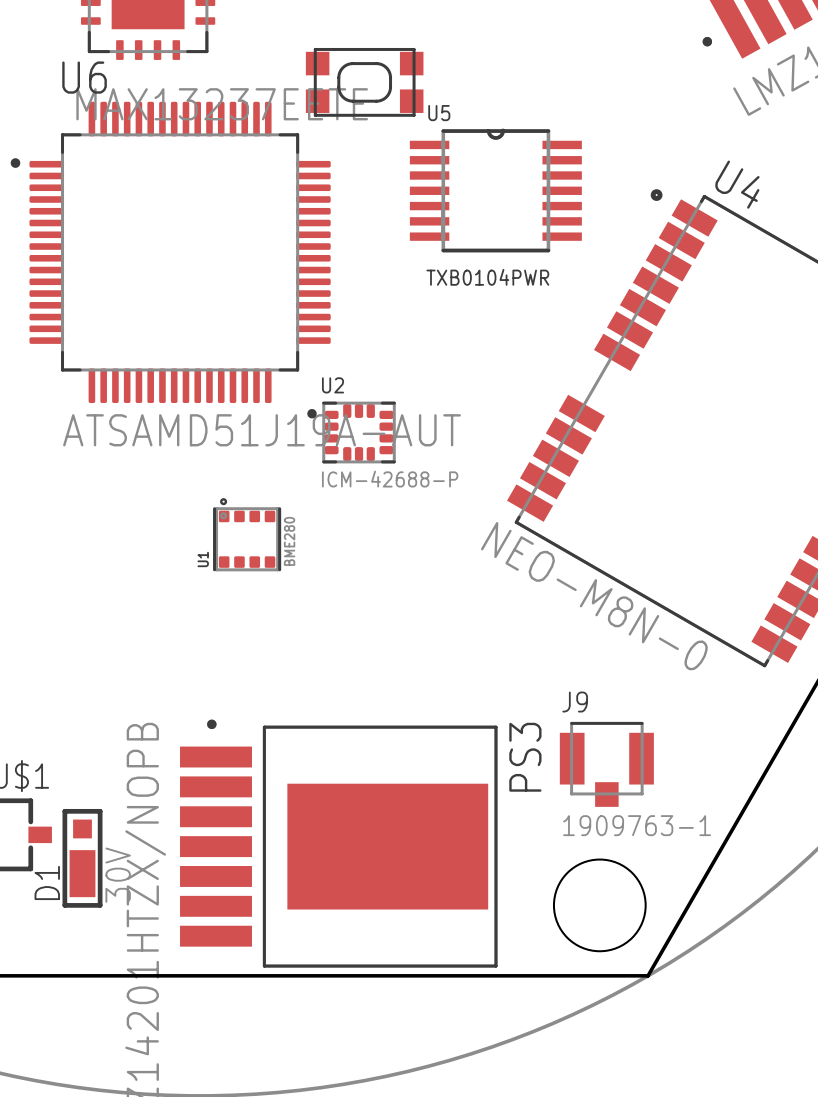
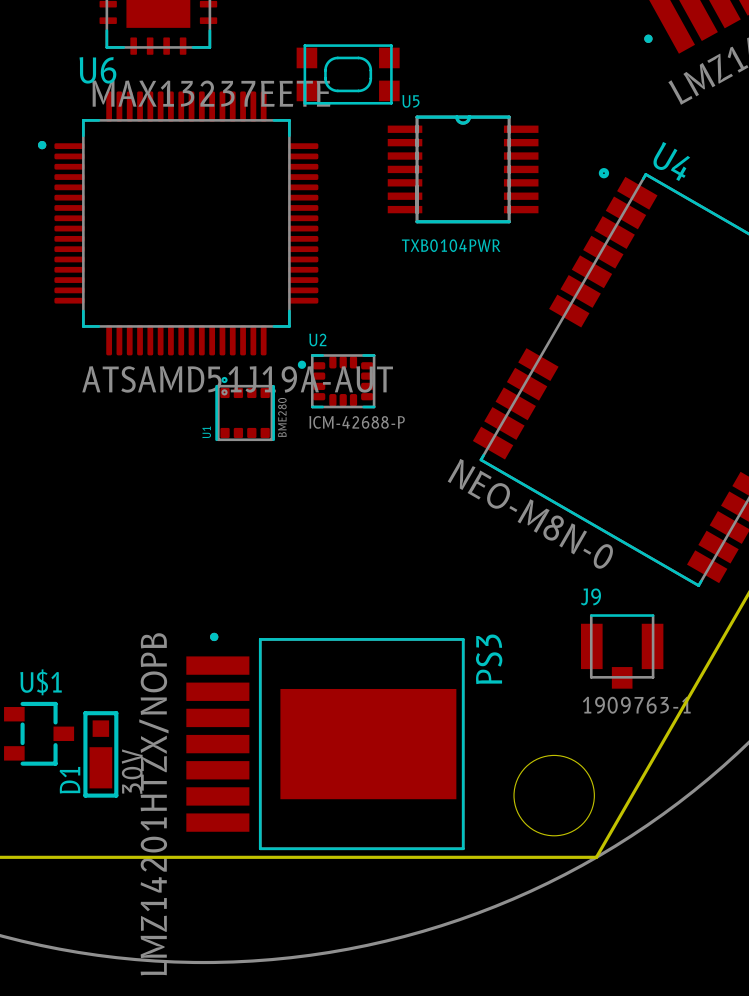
U1 position: (247, 534) -> (245, 408)
J9 position: (606, 764) -> (622, 651)

